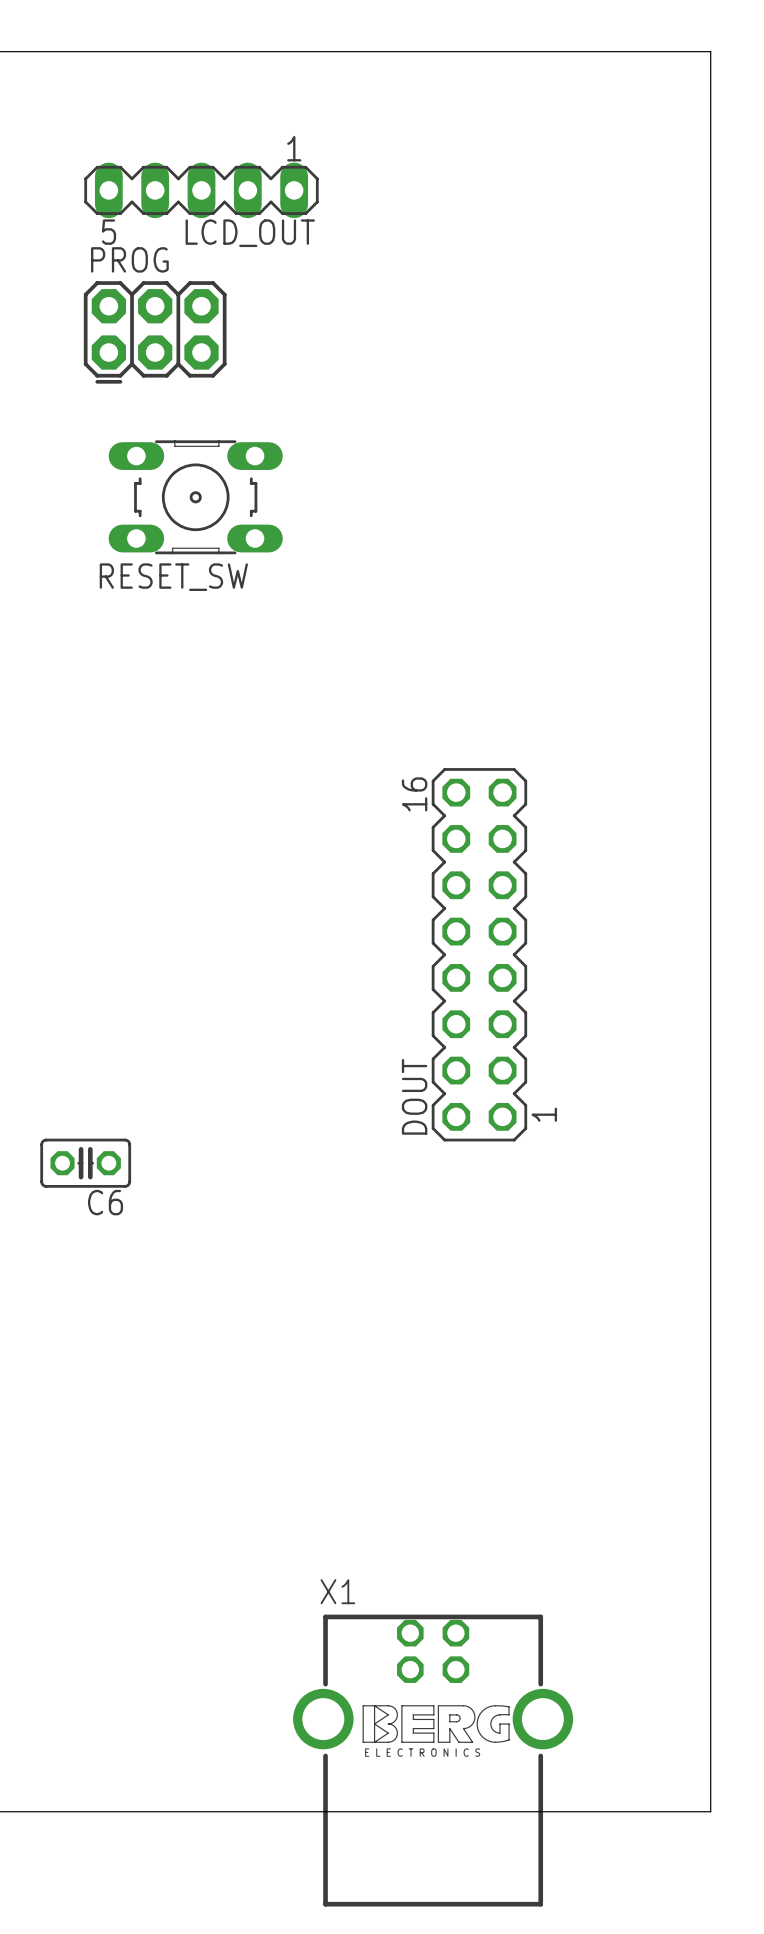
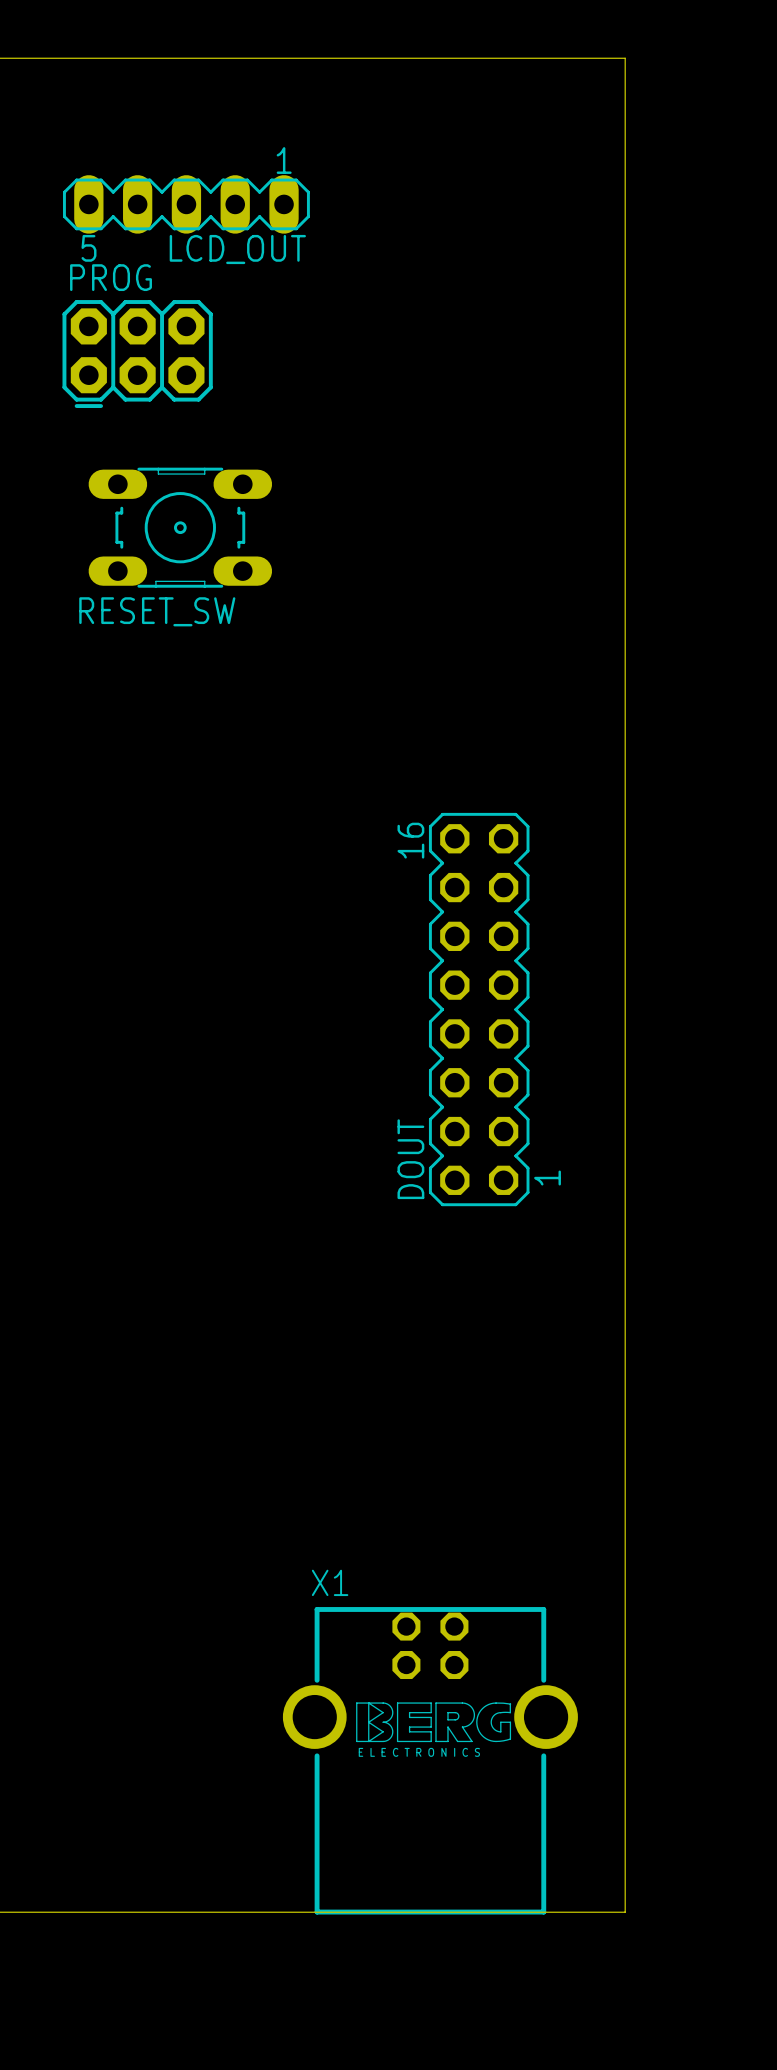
board edge: (618, 51) (710, 51) (710, 1811) (618, 1811) -> (625, 58) (625, 1912)
C6: (85, 1163) -> none
X1 position: (433, 1760) -> (430, 1760)

